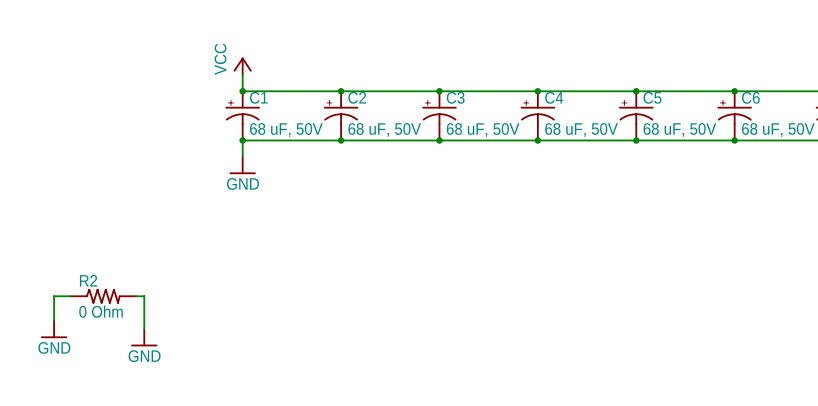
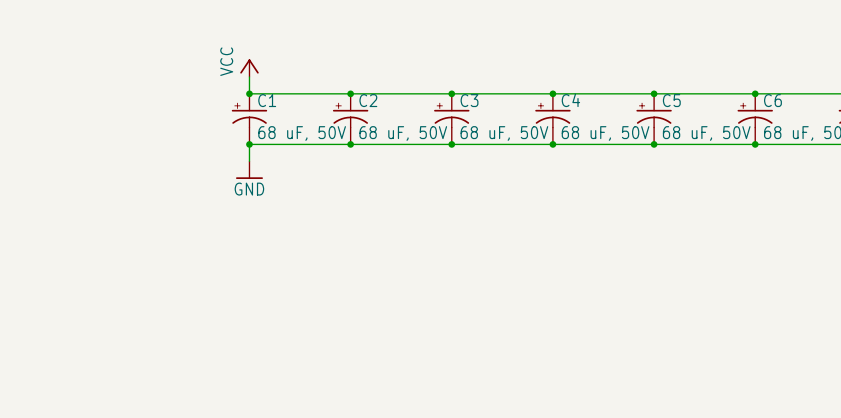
wire: (70, 296) (54, 296) (54, 320) -> none
R2: 0 Ohm (103, 296) -> none
wire: (136, 296) (144, 296) (144, 329) -> none
power symbol: GND (54, 329) -> none
power symbol: GND (144, 337) -> none

